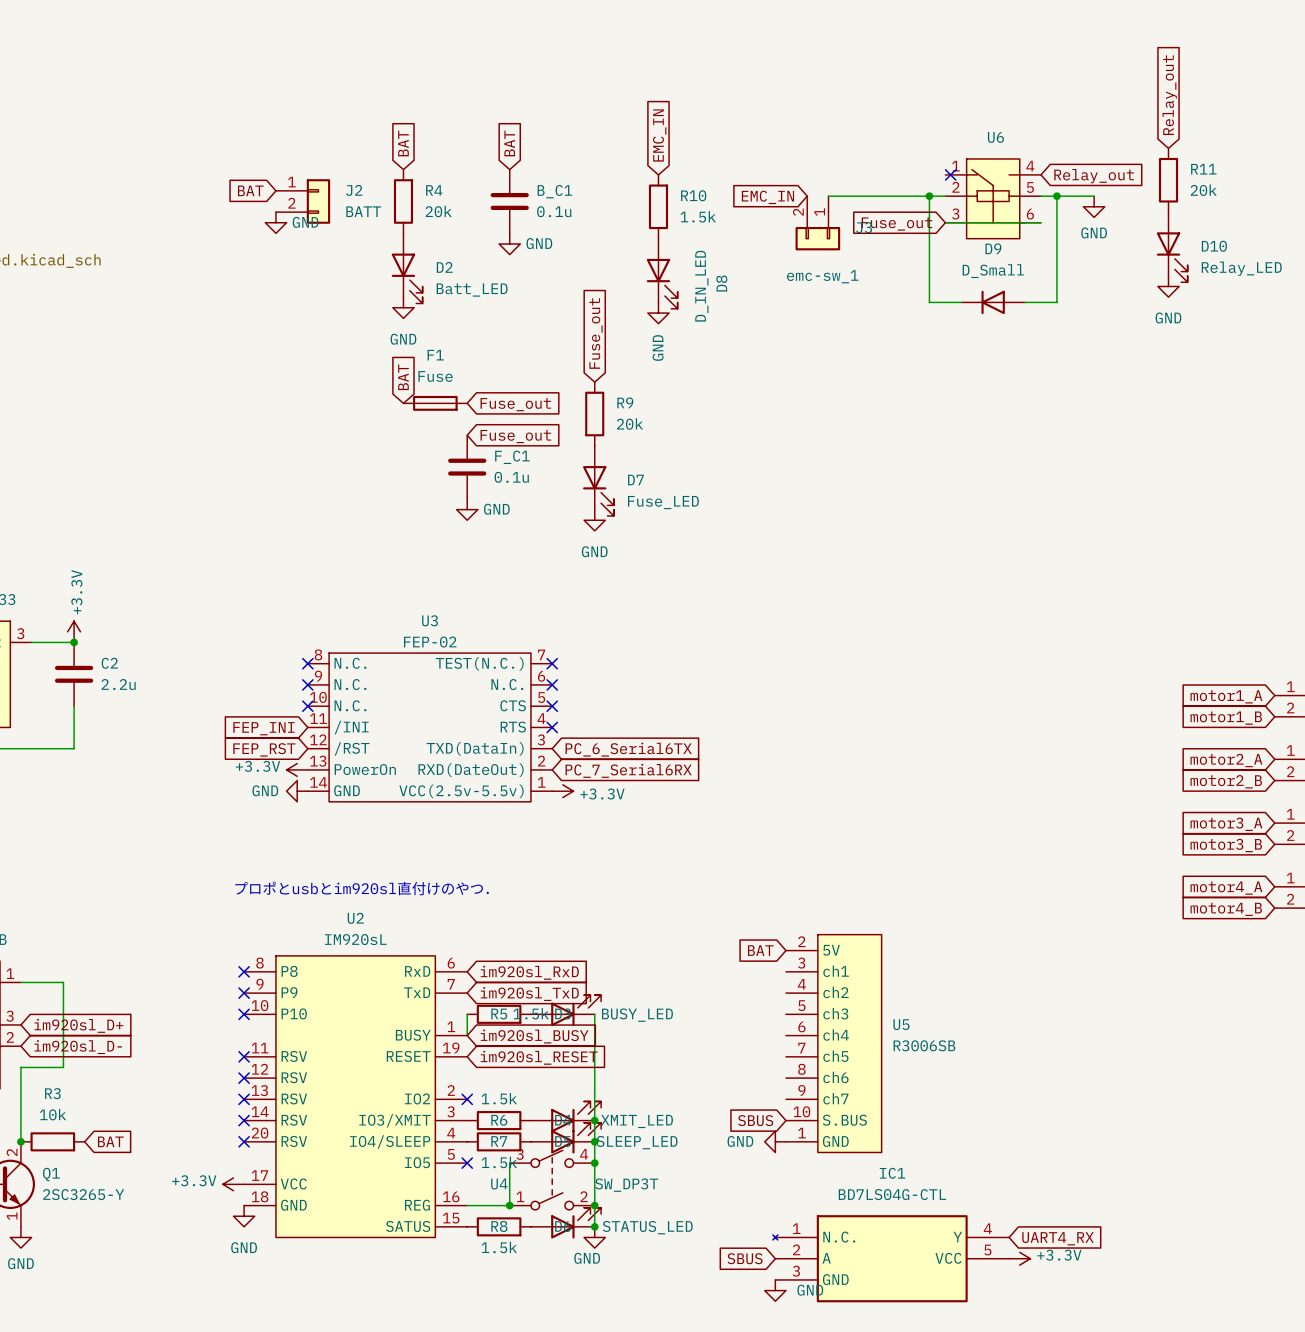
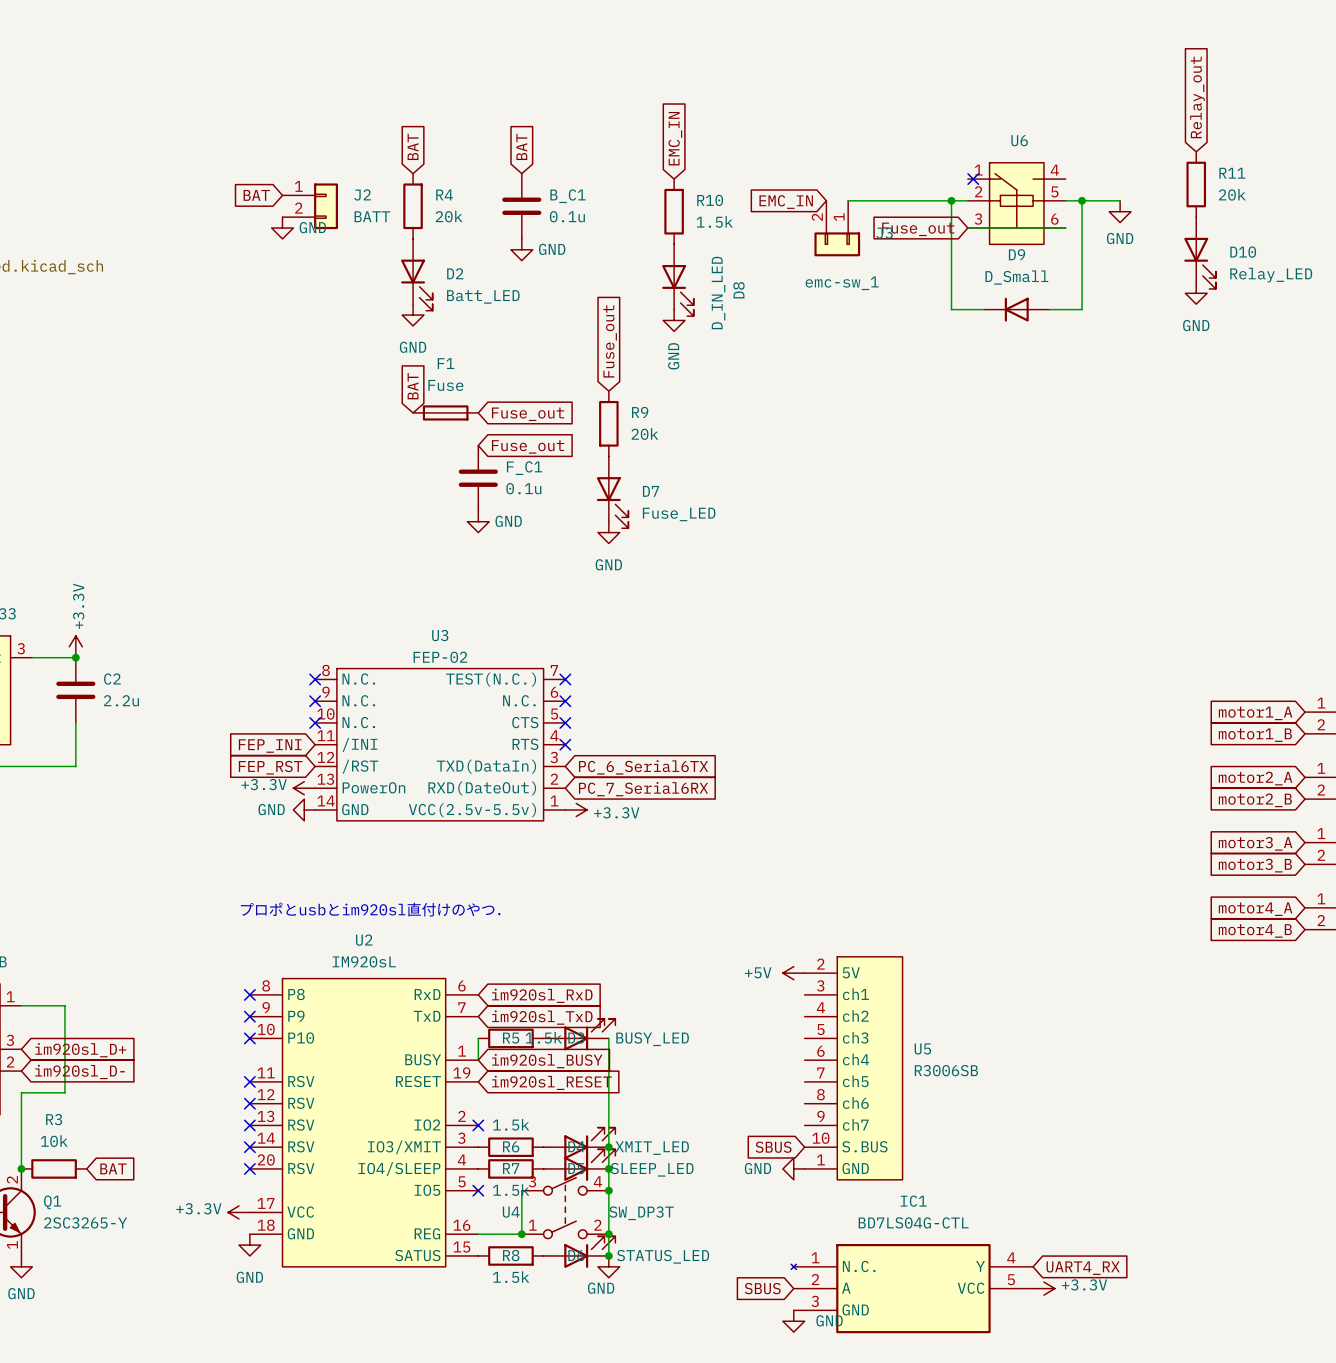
global label: Relay_out (1094, 176) -> none
global label: BAT (760, 950) -> none
power symbol: none -> +5V (793, 973)

